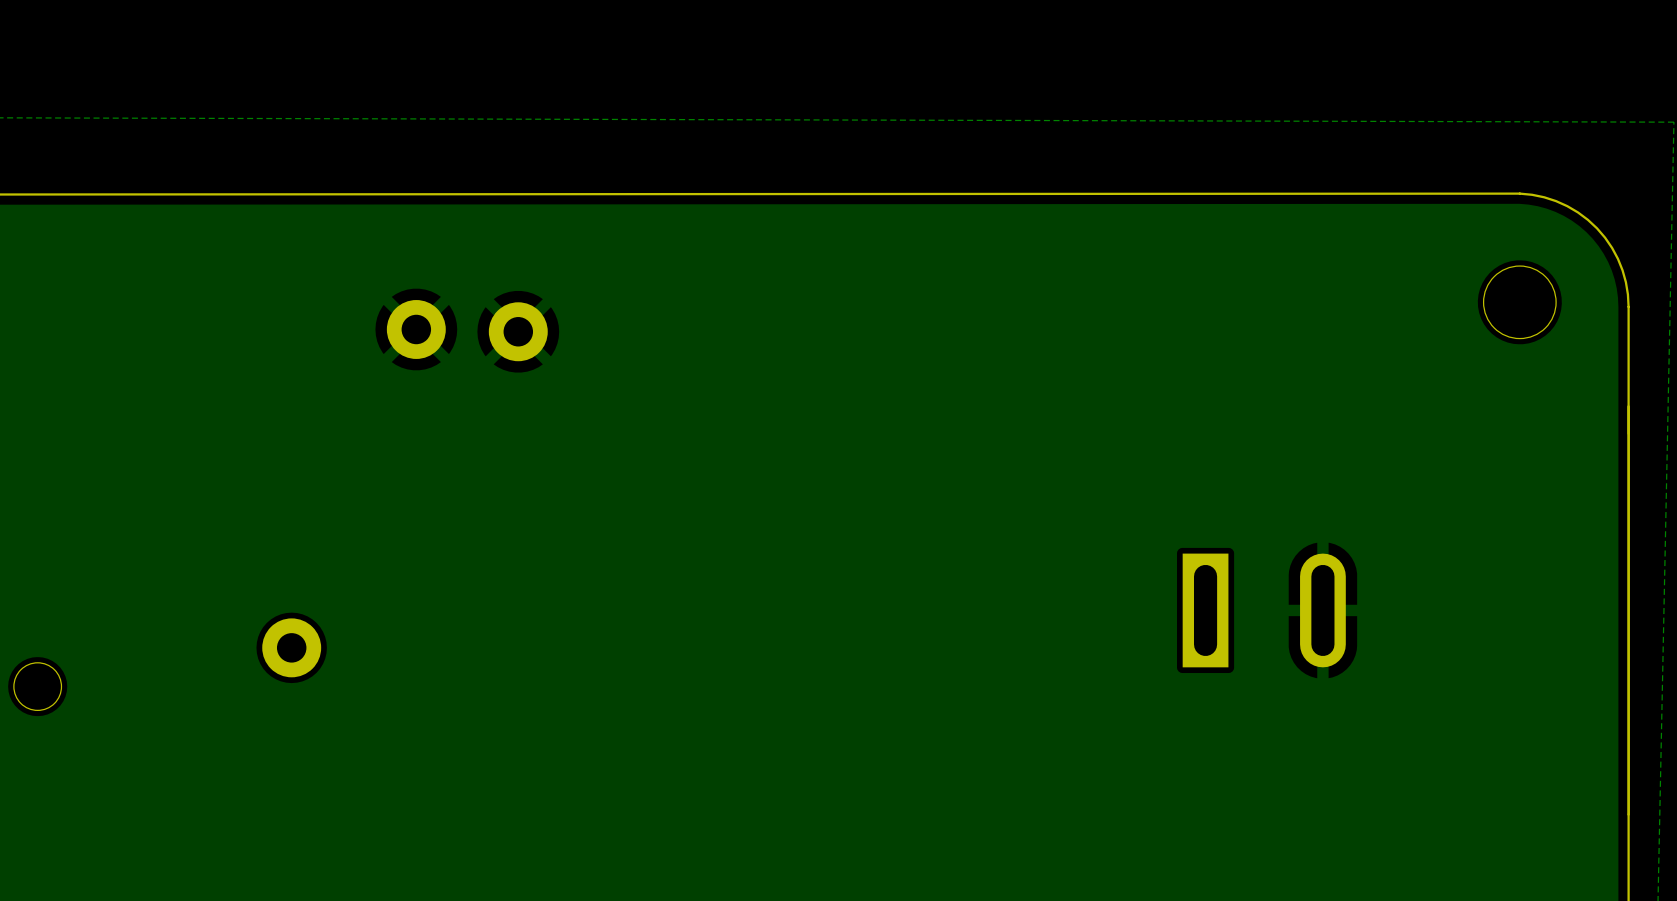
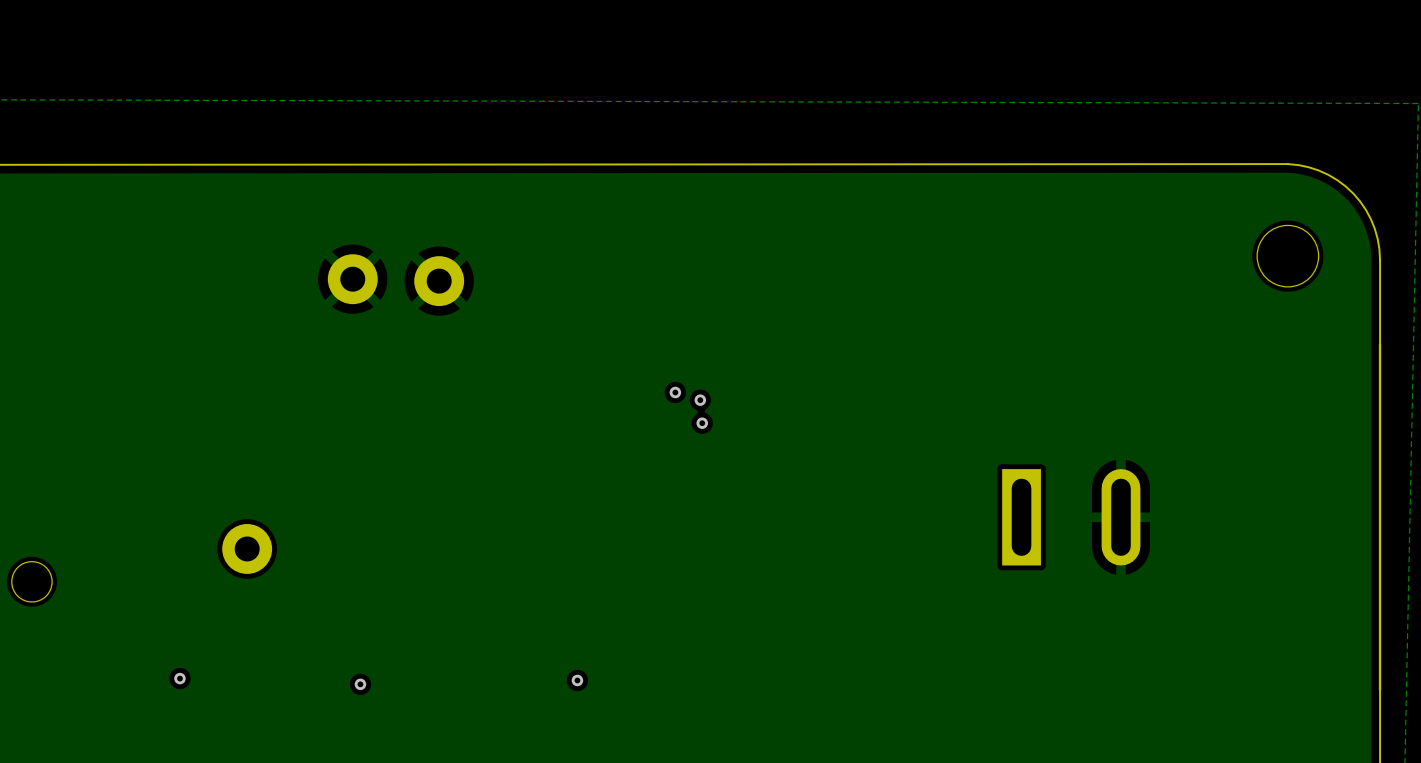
via: none -> (675, 392)
via: none -> (700, 400)
via: none -> (702, 423)
via: none -> (179, 678)
via: none -> (577, 680)
via: none -> (360, 684)

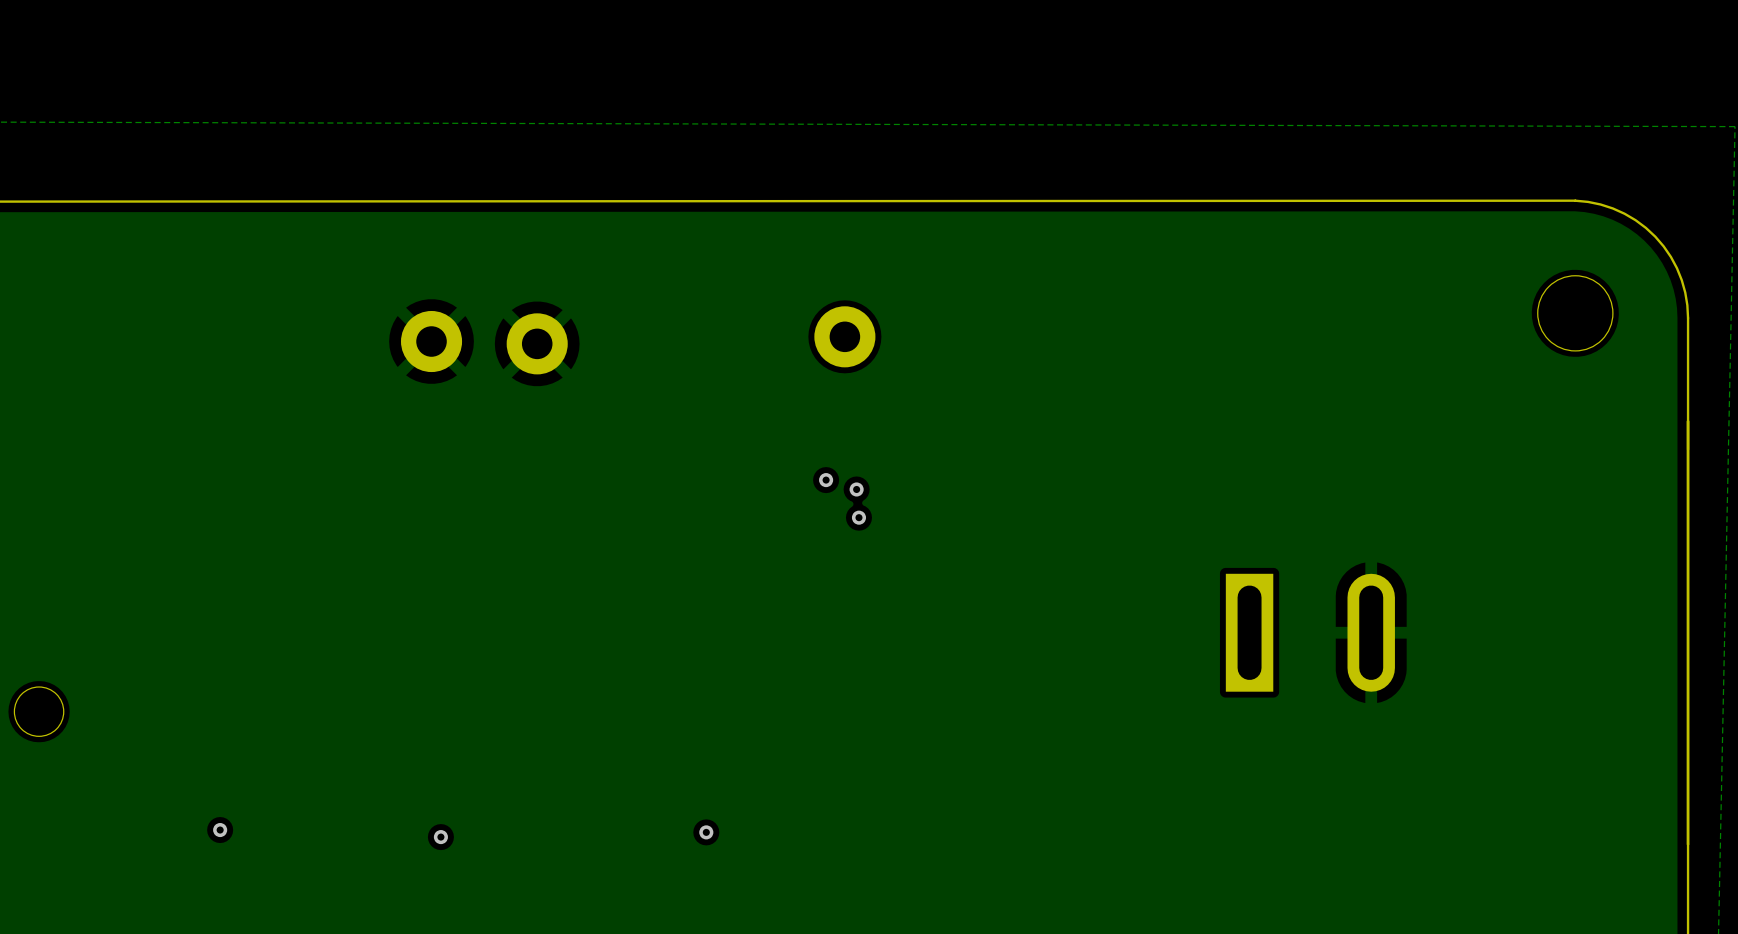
part: none -> (844, 336)
part: (247, 548) -> none

